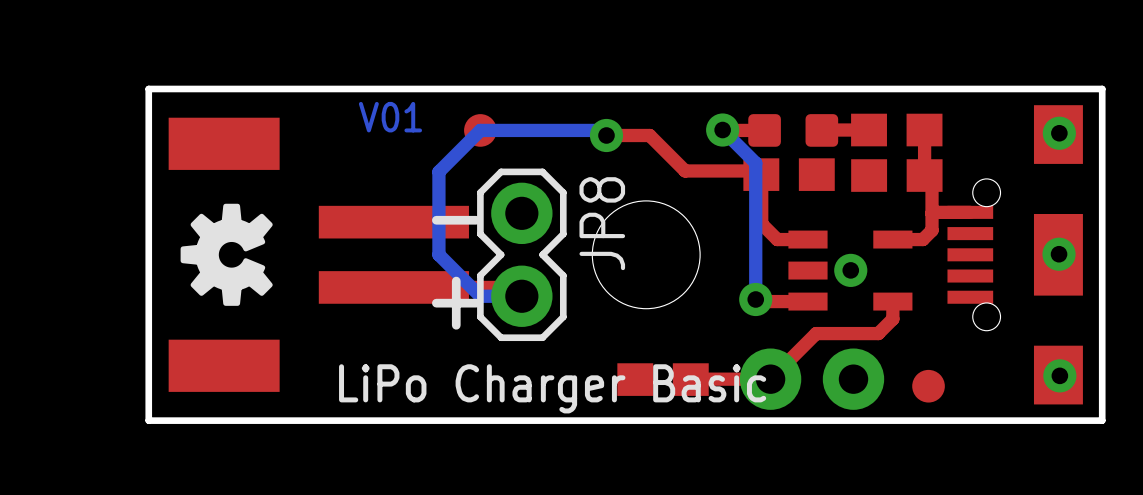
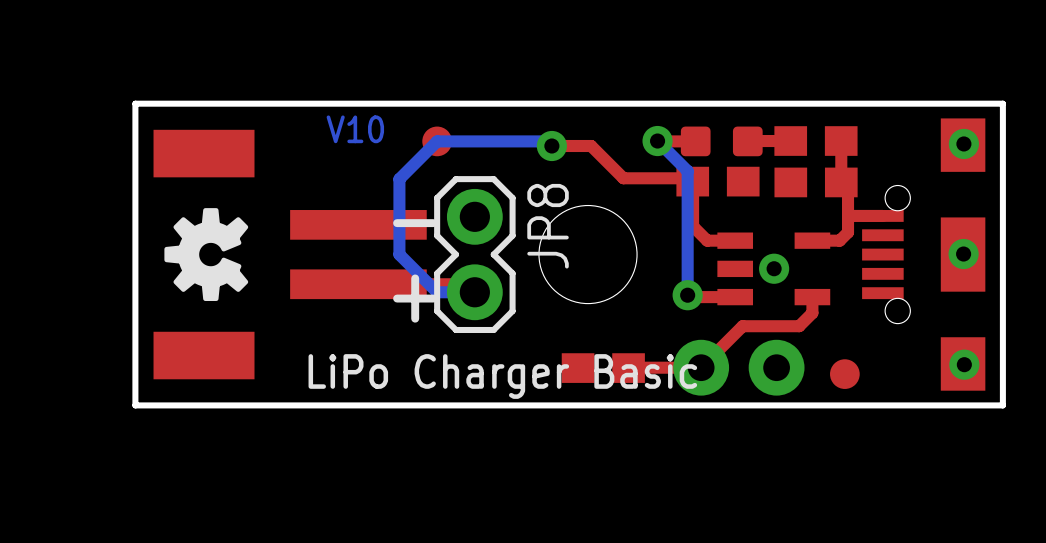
text: V01 (390, 117) -> V10 (355, 129)

